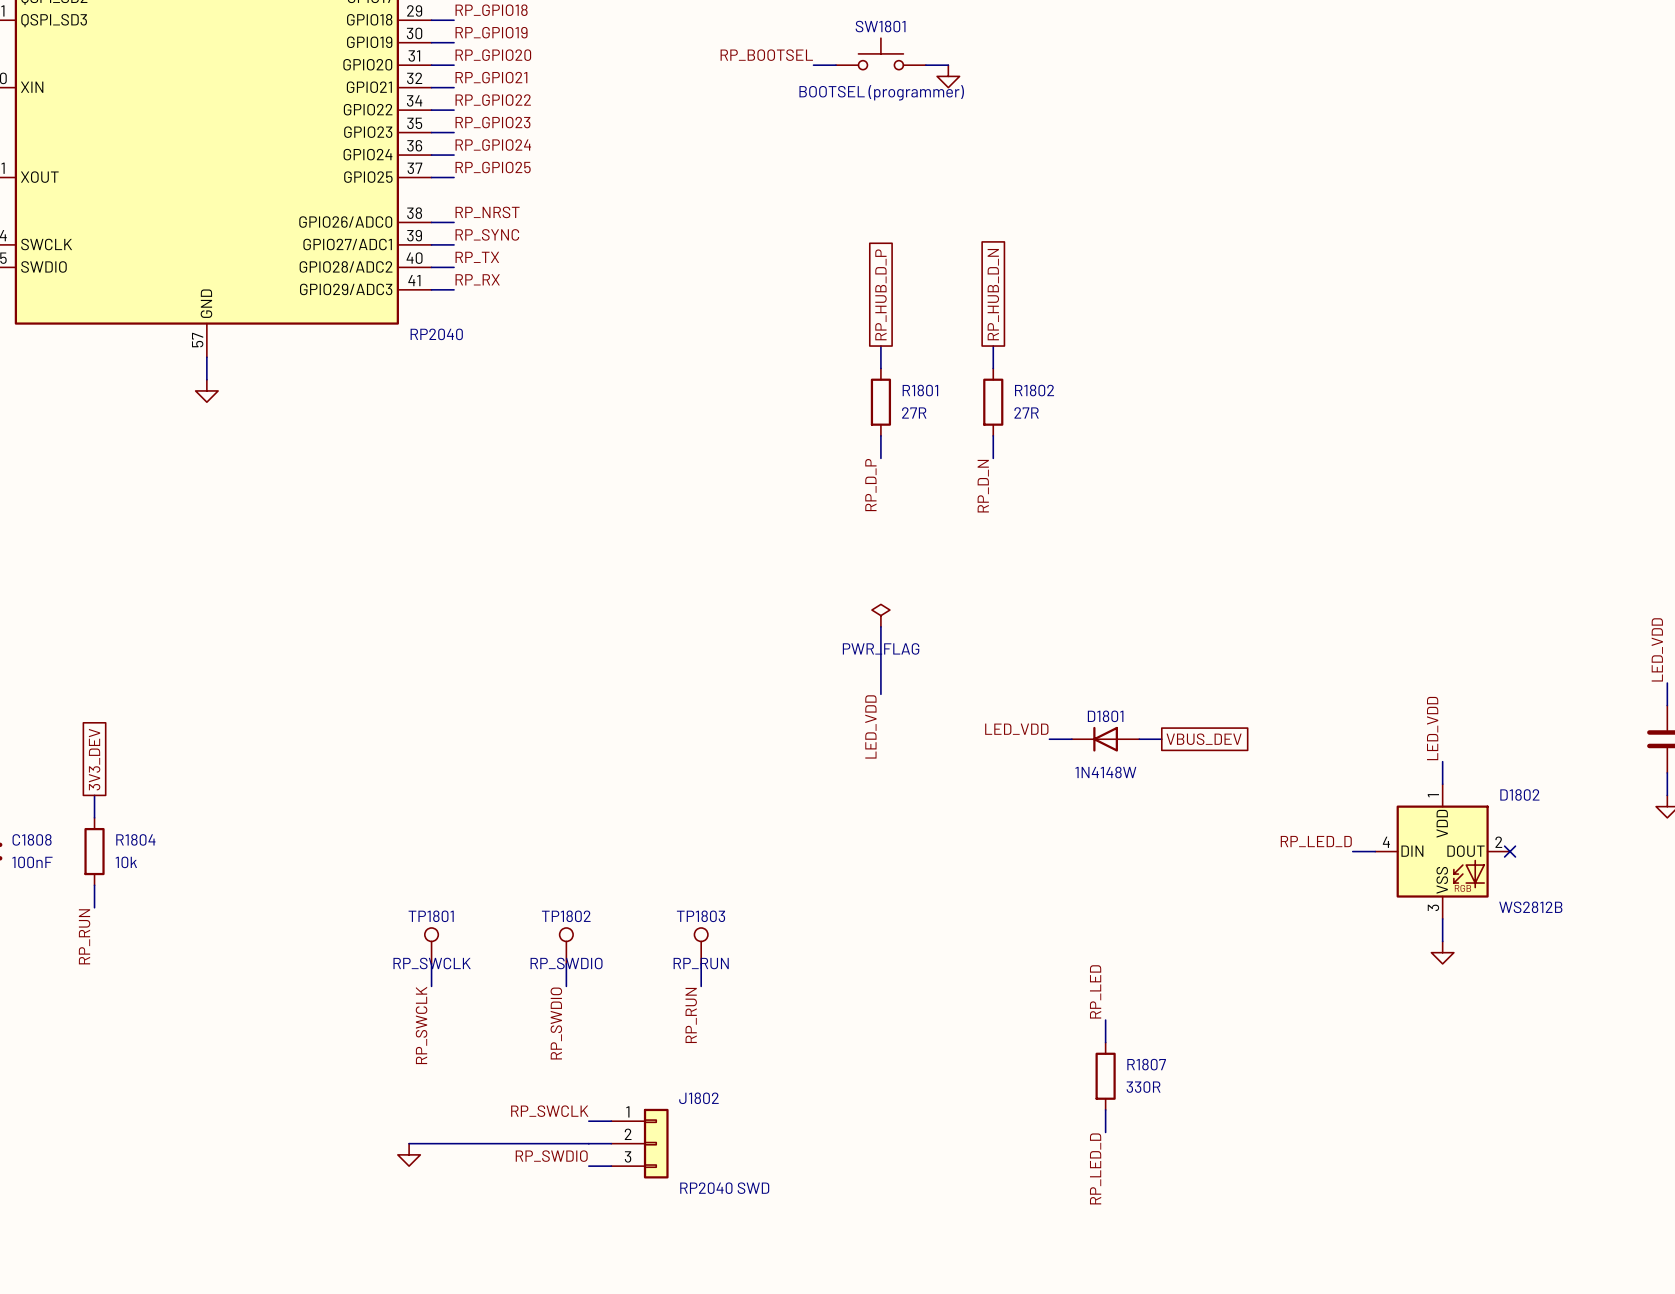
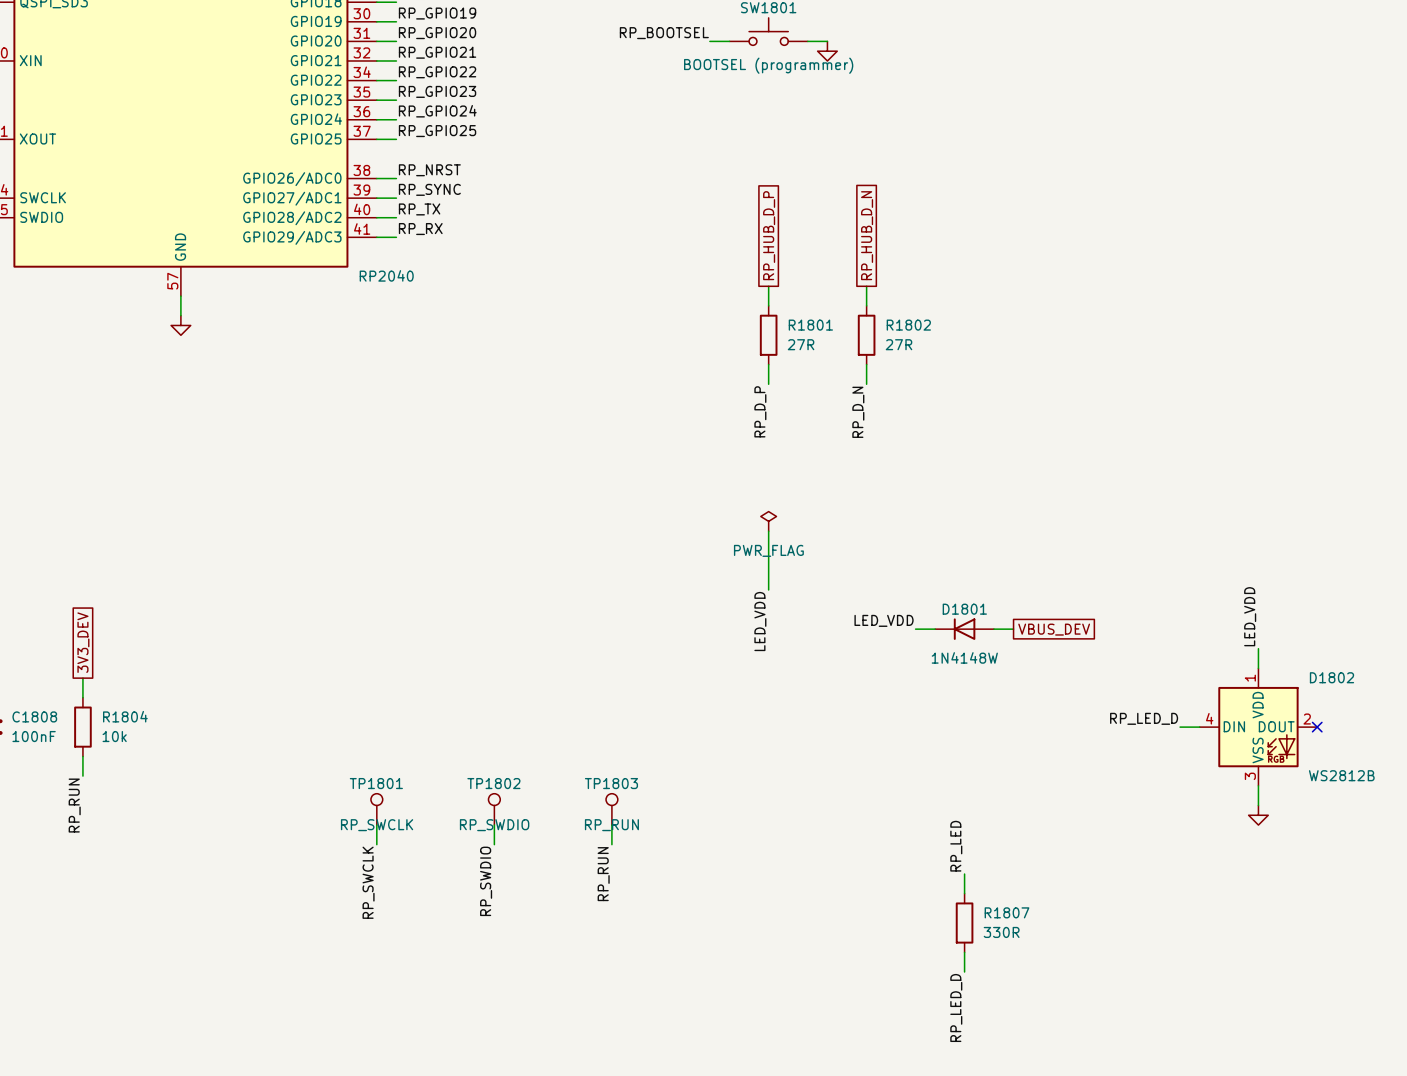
label: RP_SWCLK (549, 1111) -> none
wire: (588, 1121) (611, 1121) -> none
wire: (409, 1143) (611, 1143) -> none
J1802: RP2040 SWD (639, 1143) -> none
power symbol: (409, 1154) -> none
label: RP_SWDIO (551, 1156) -> none
wire: (588, 1166) (611, 1166) -> none

